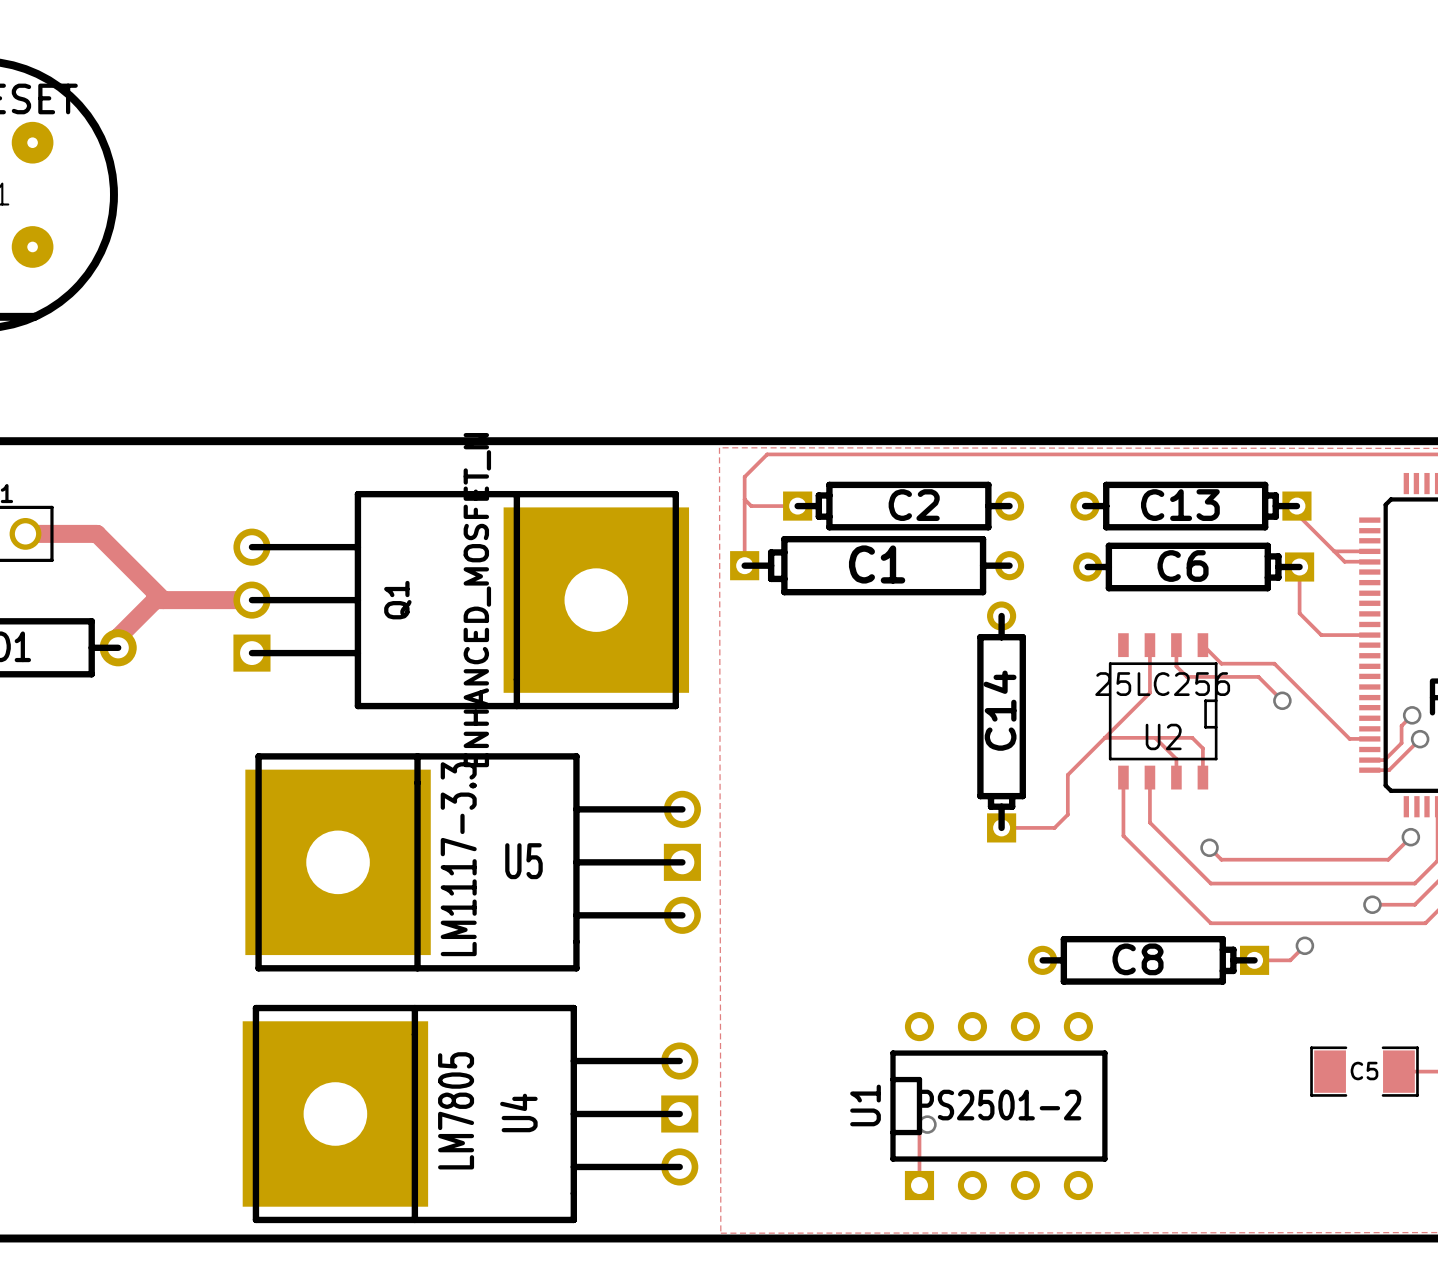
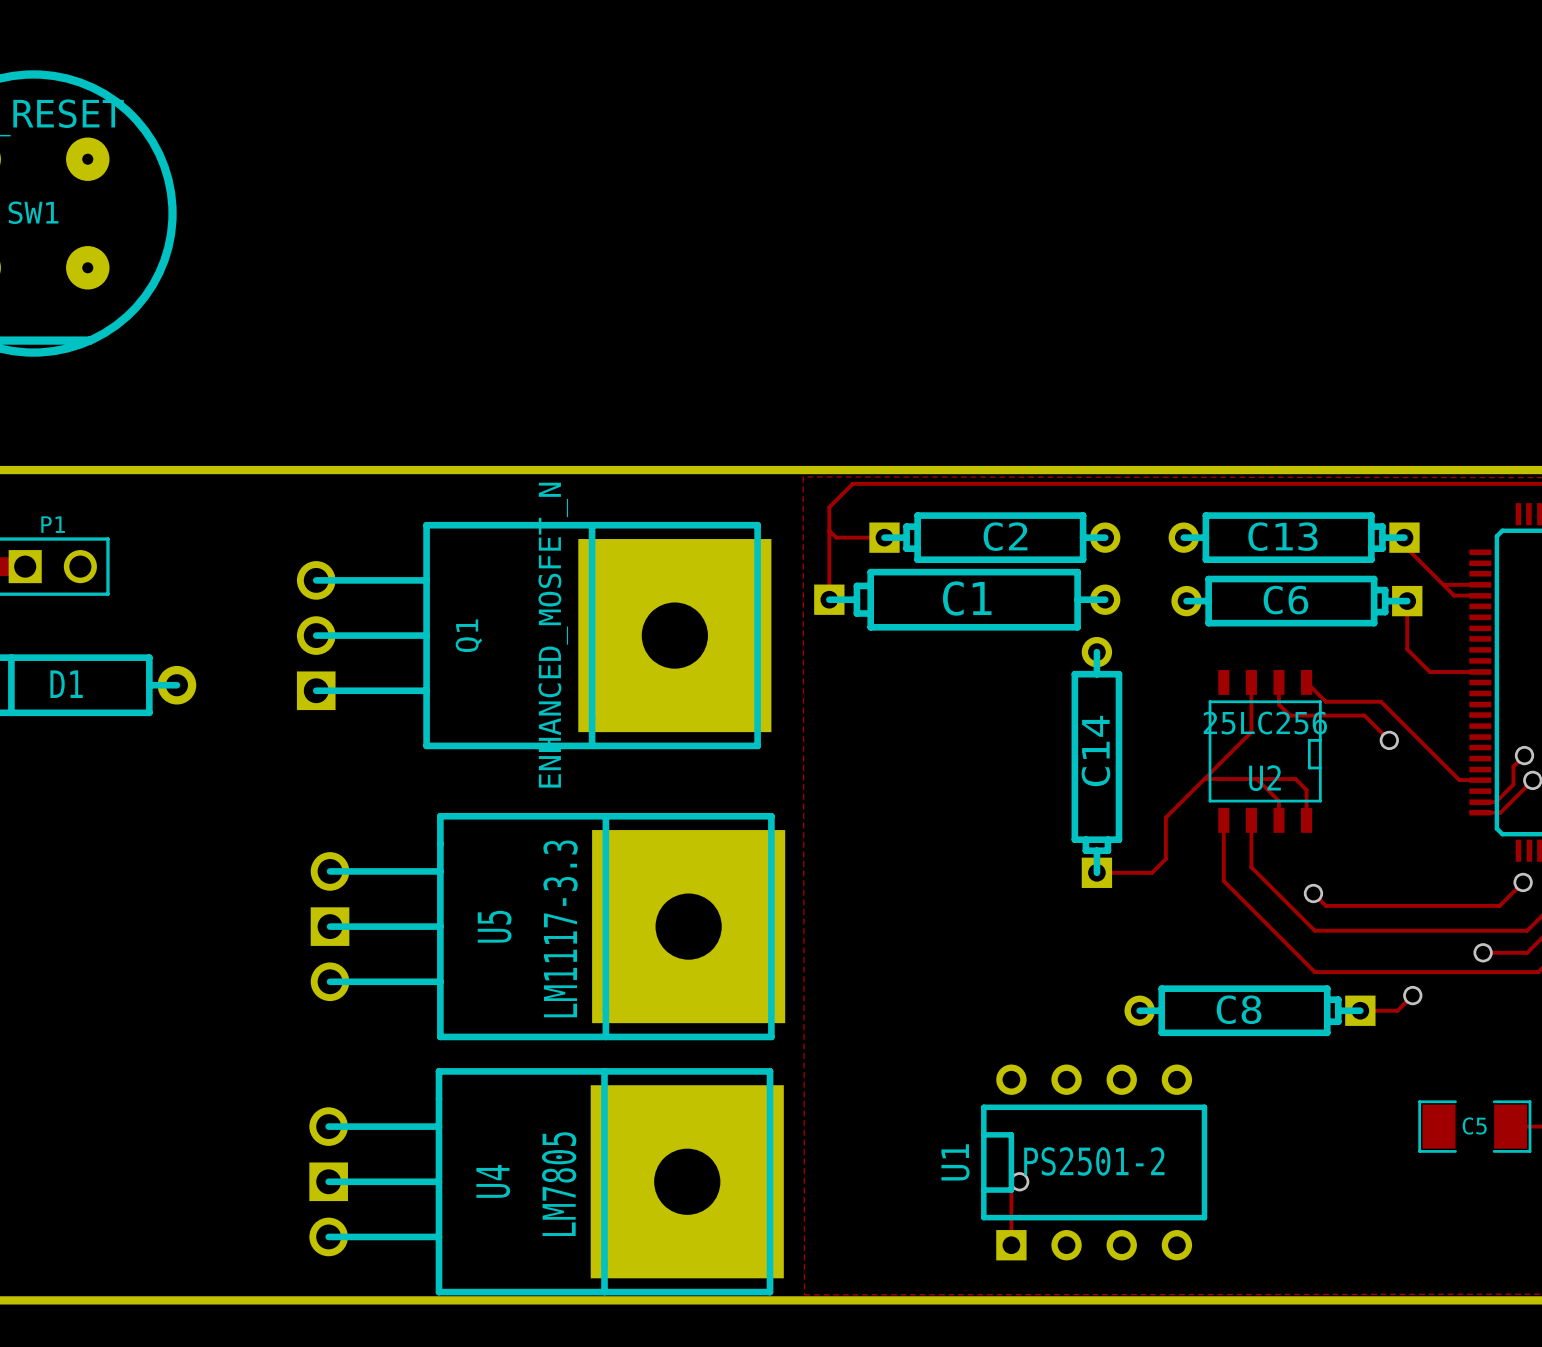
track: (25, 533) (97, 533) (163, 600) -> none
track: (251, 600) (155, 600) (118, 637) (118, 647) -> none
U5 rotation: 0° (473, 862) -> 180° (547, 926)
U4 rotation: 0° (470, 1113) -> 180° (546, 1181)

